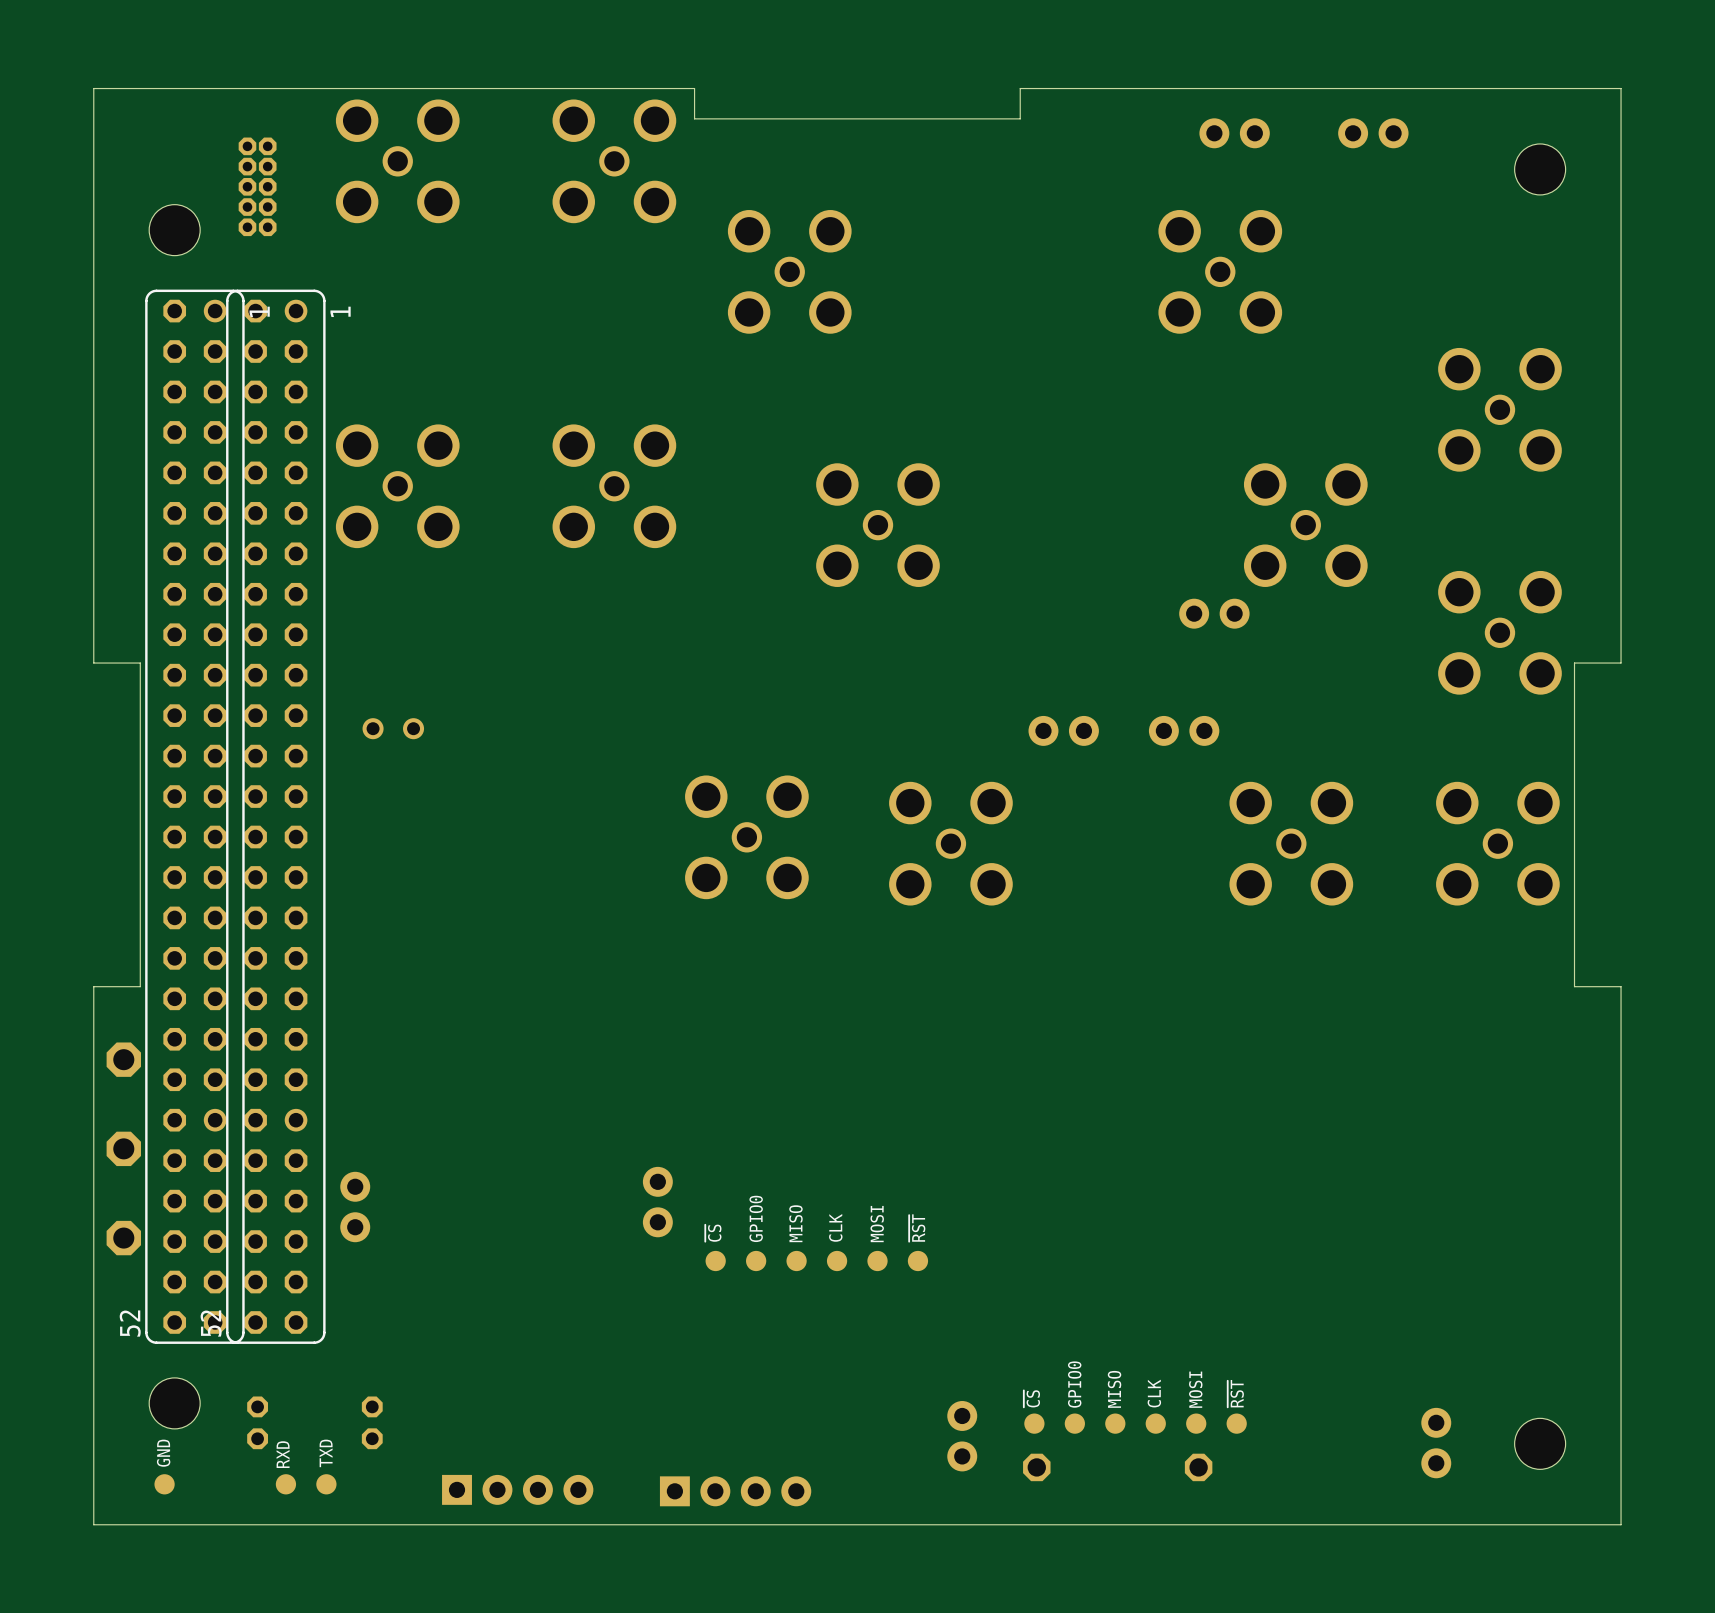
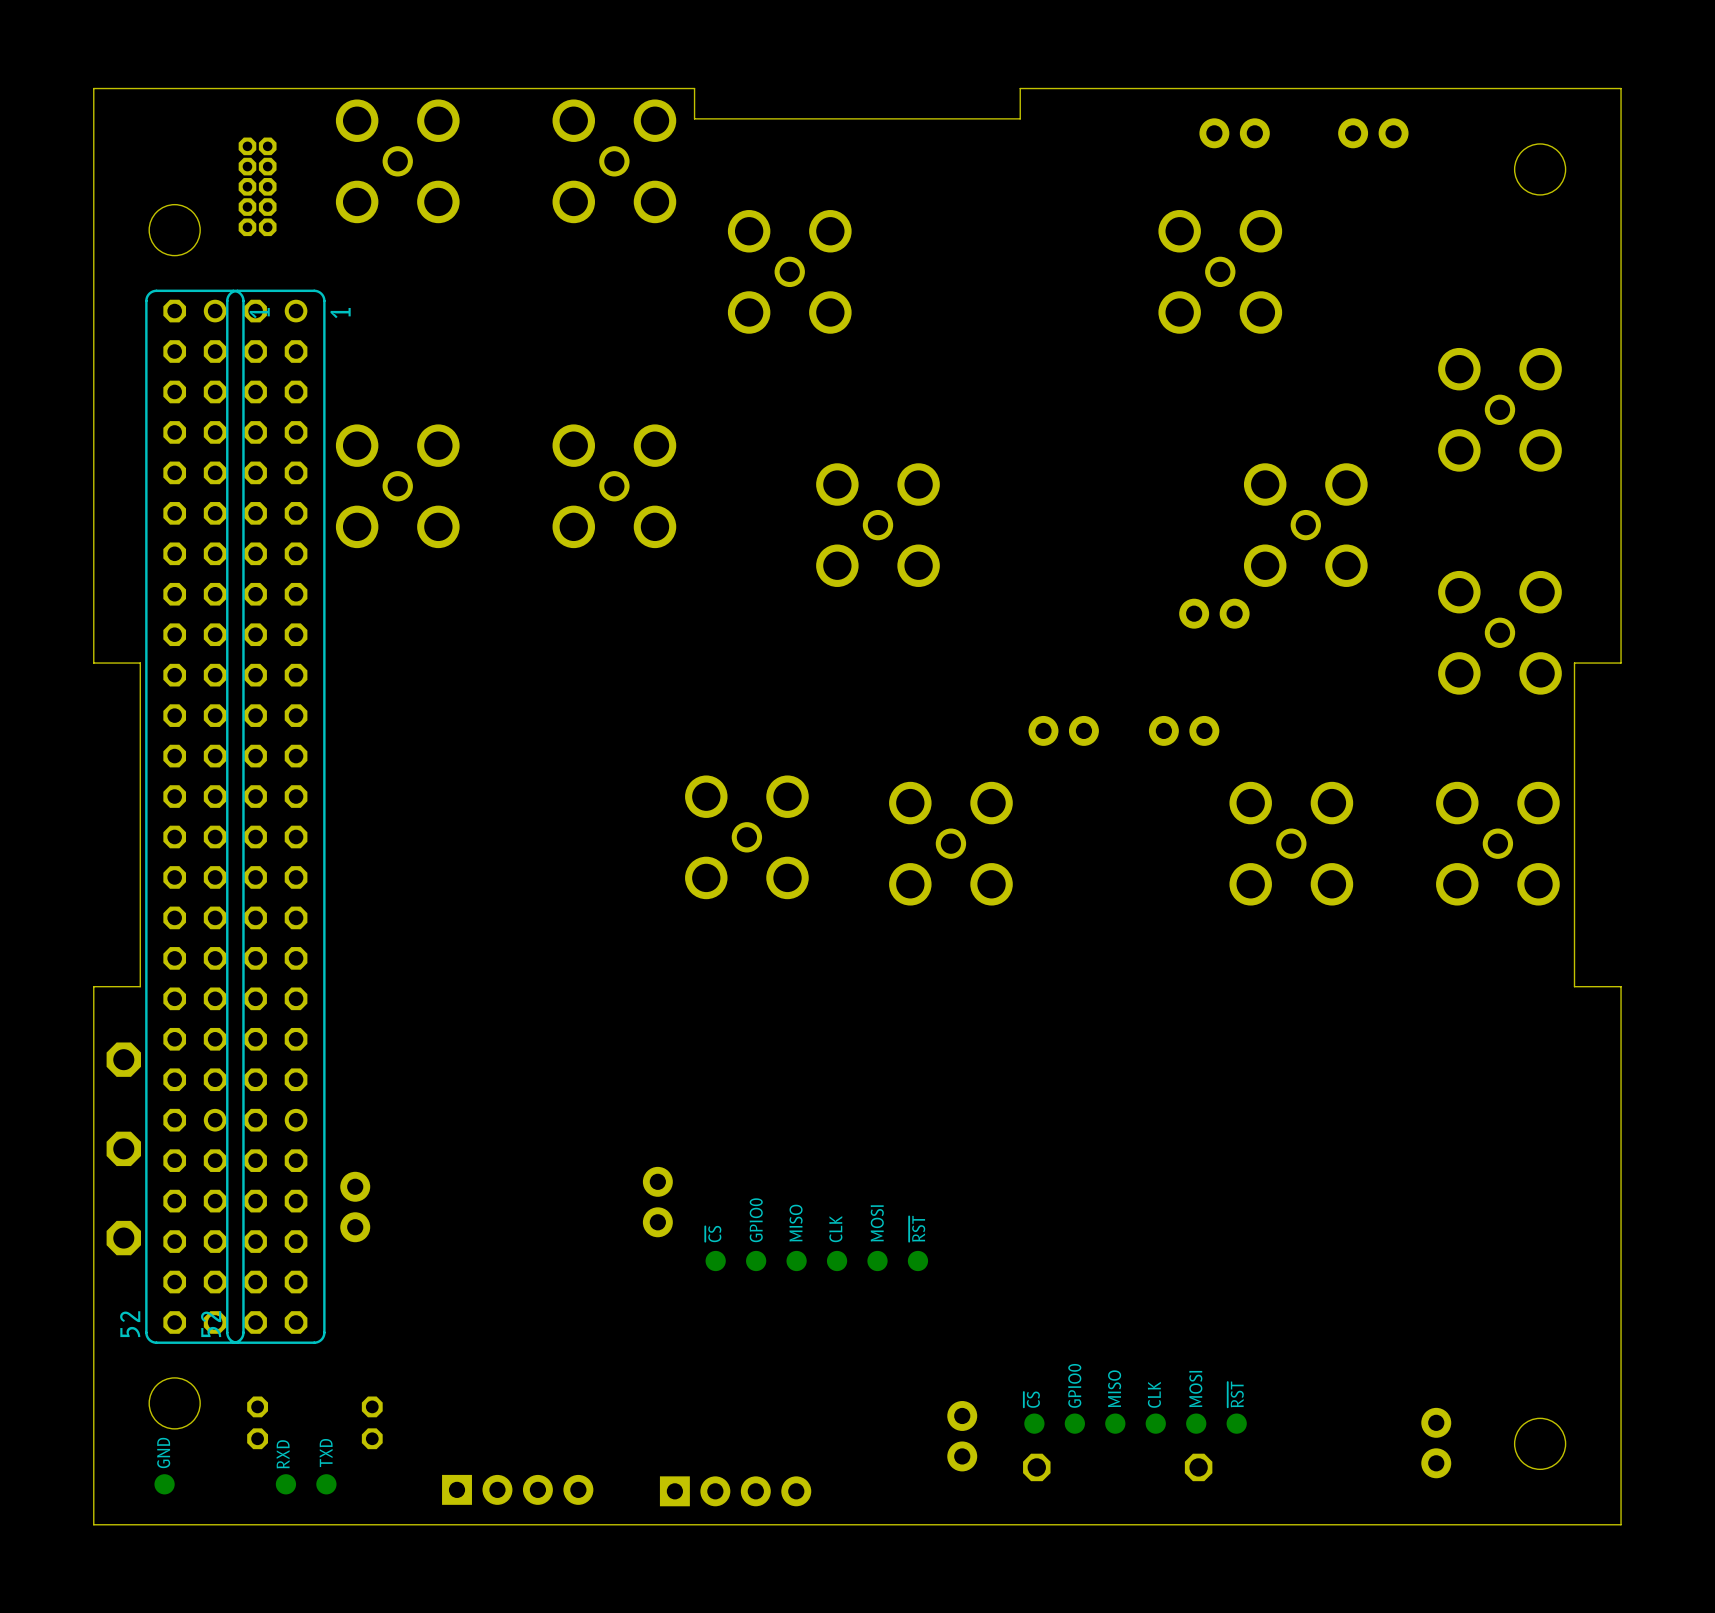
part: (393, 728) -> none

